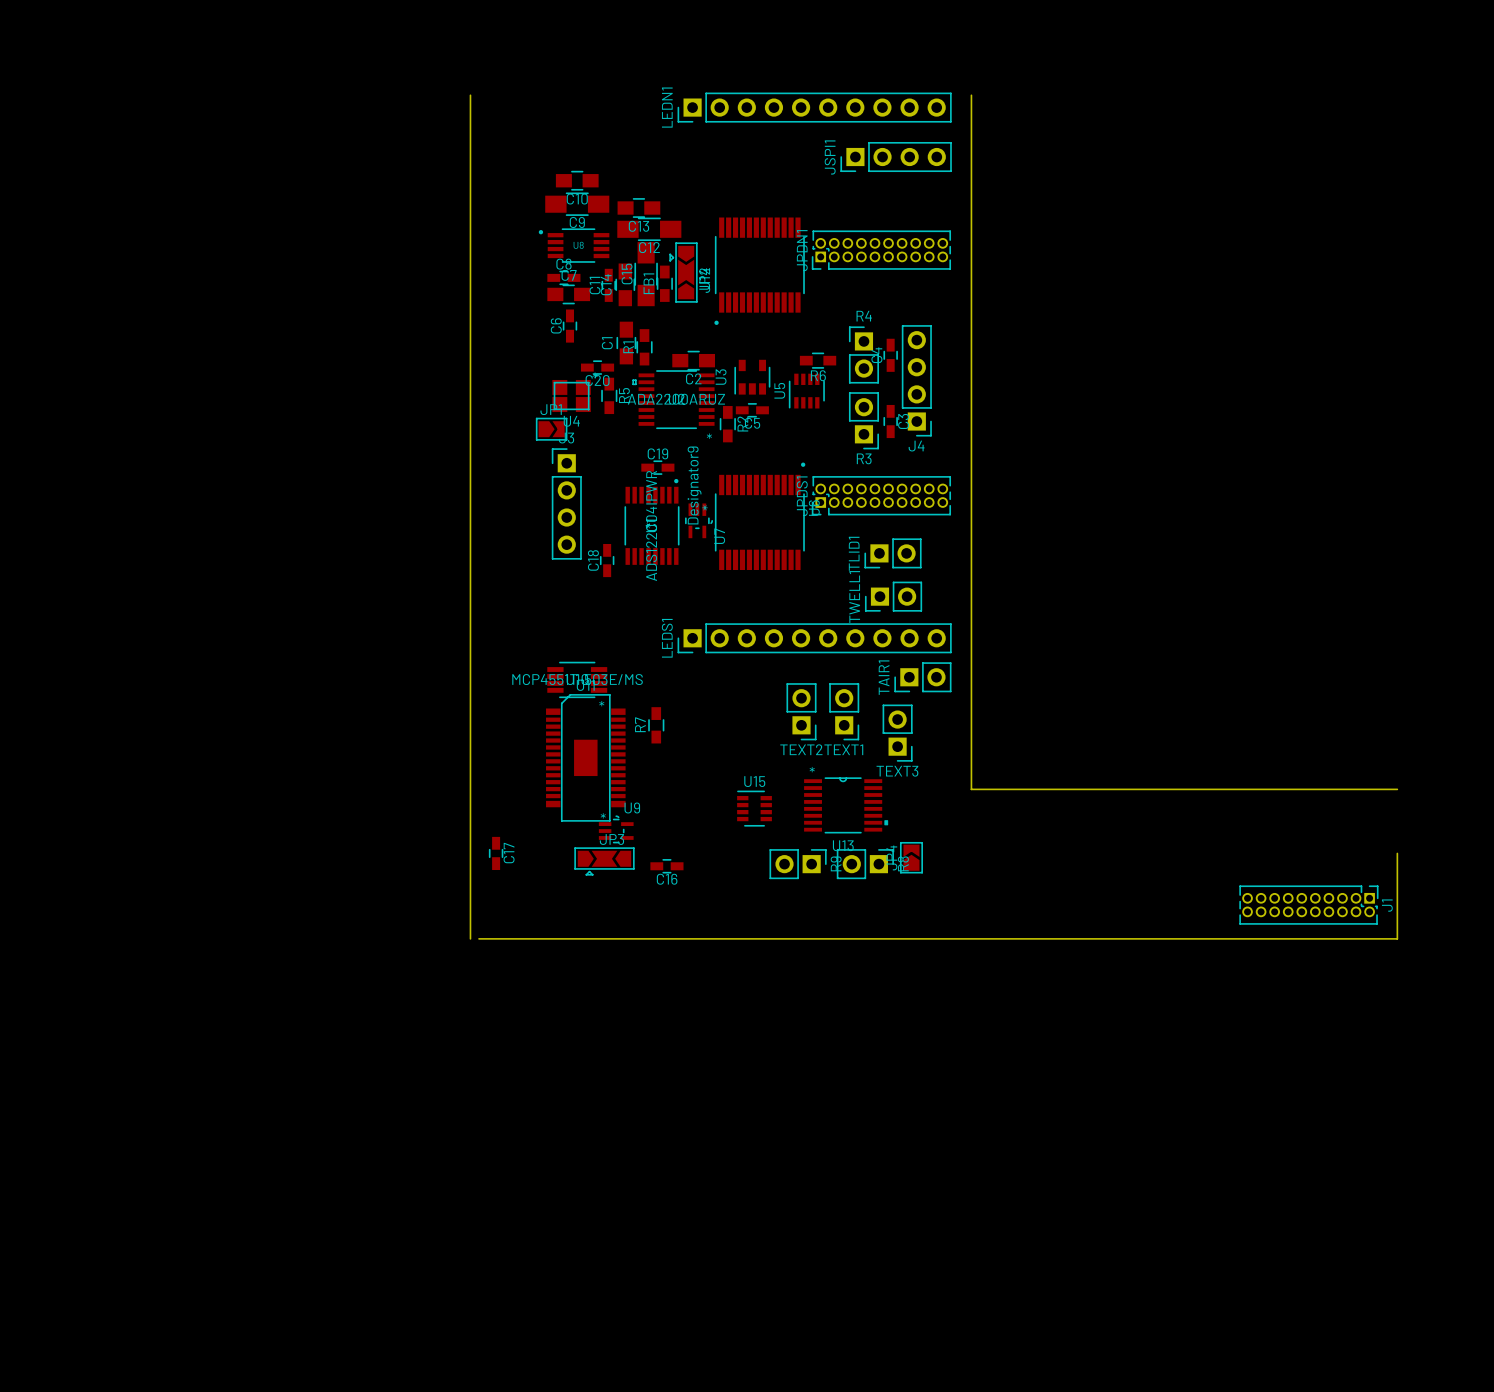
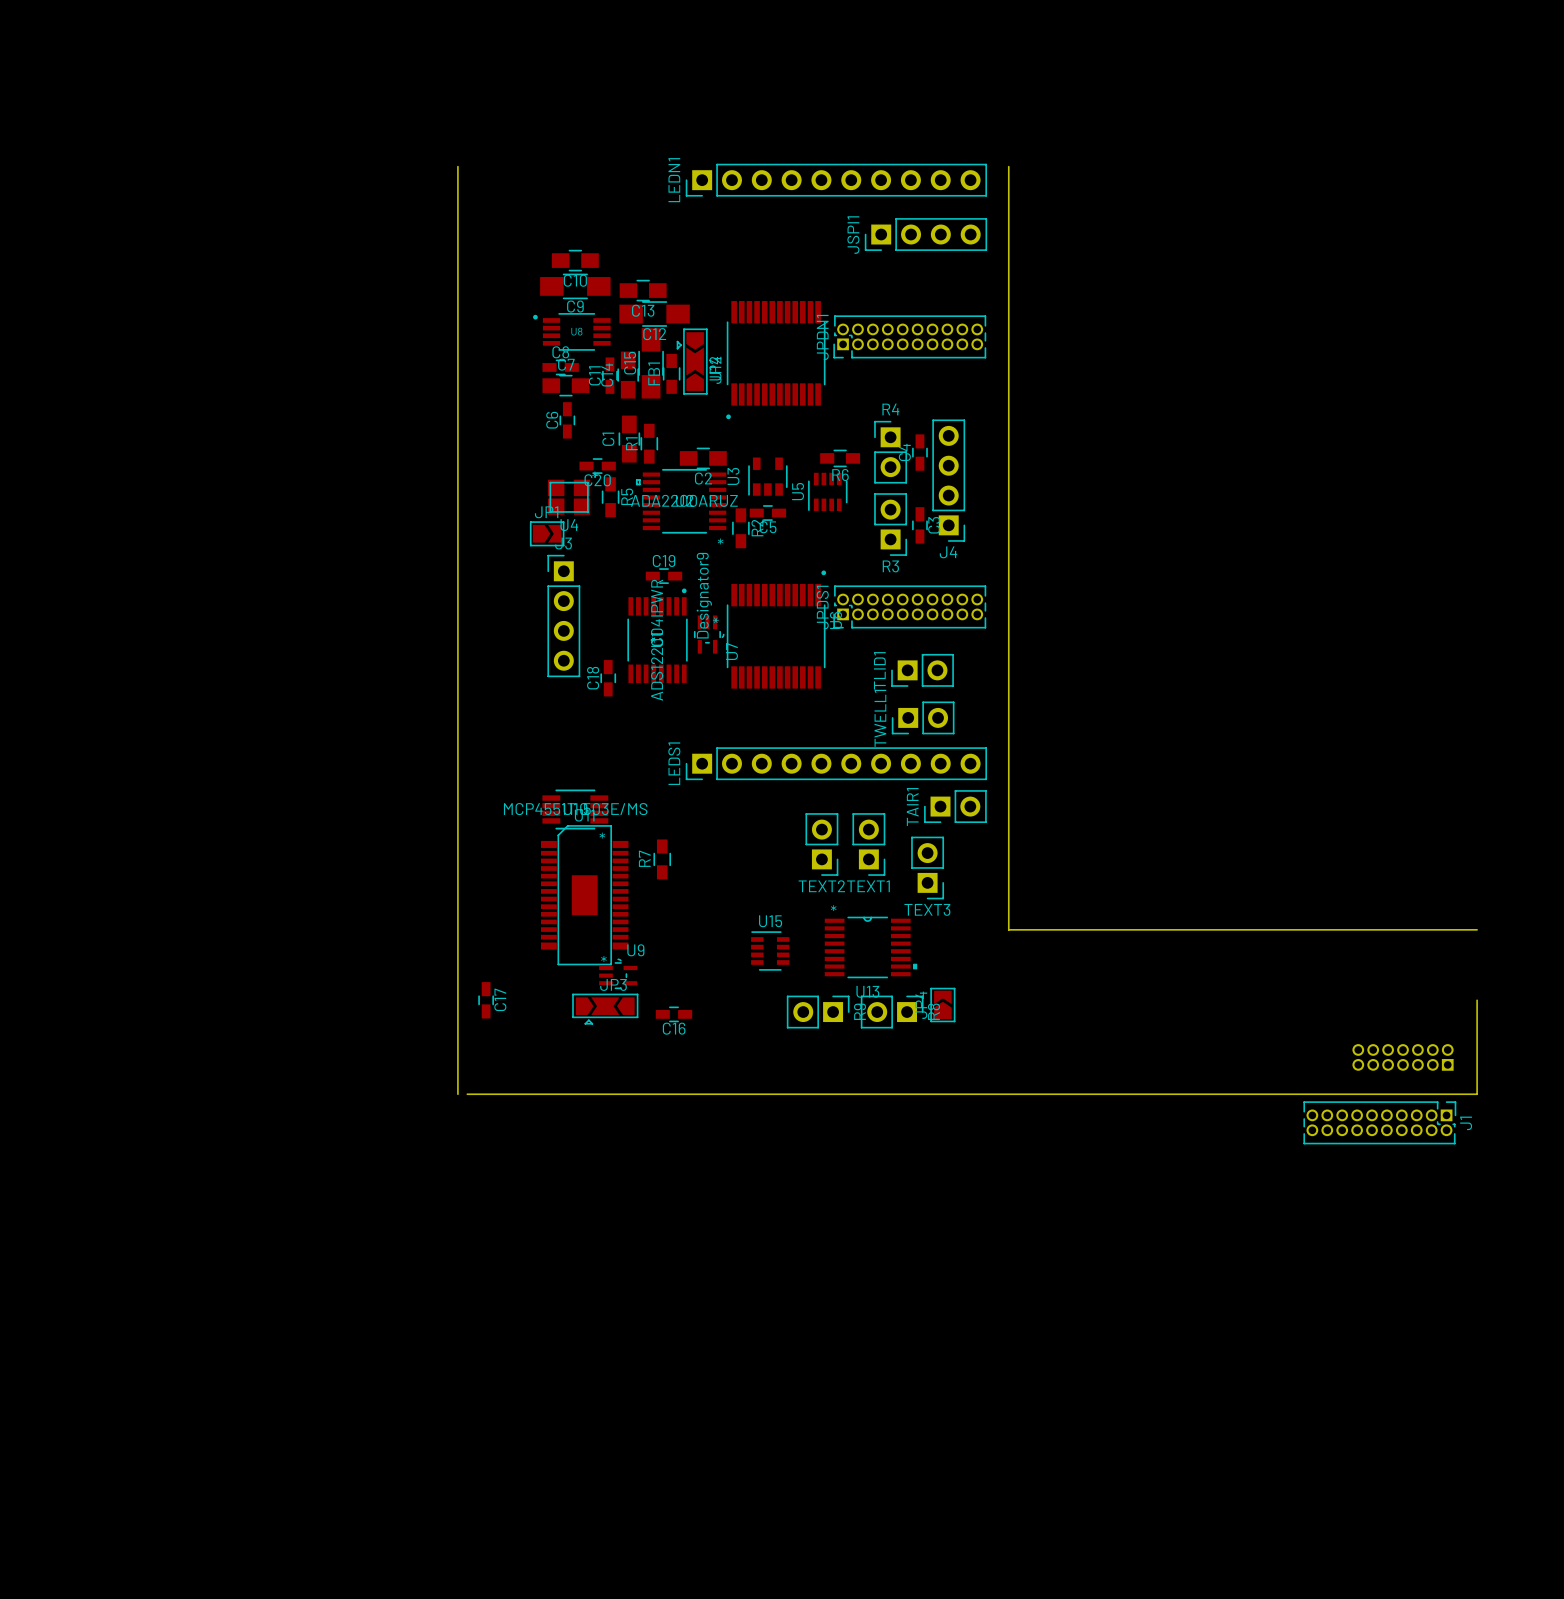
J1 position: (1308, 905) -> (1379, 1122)
part: none -> (1403, 1057)

